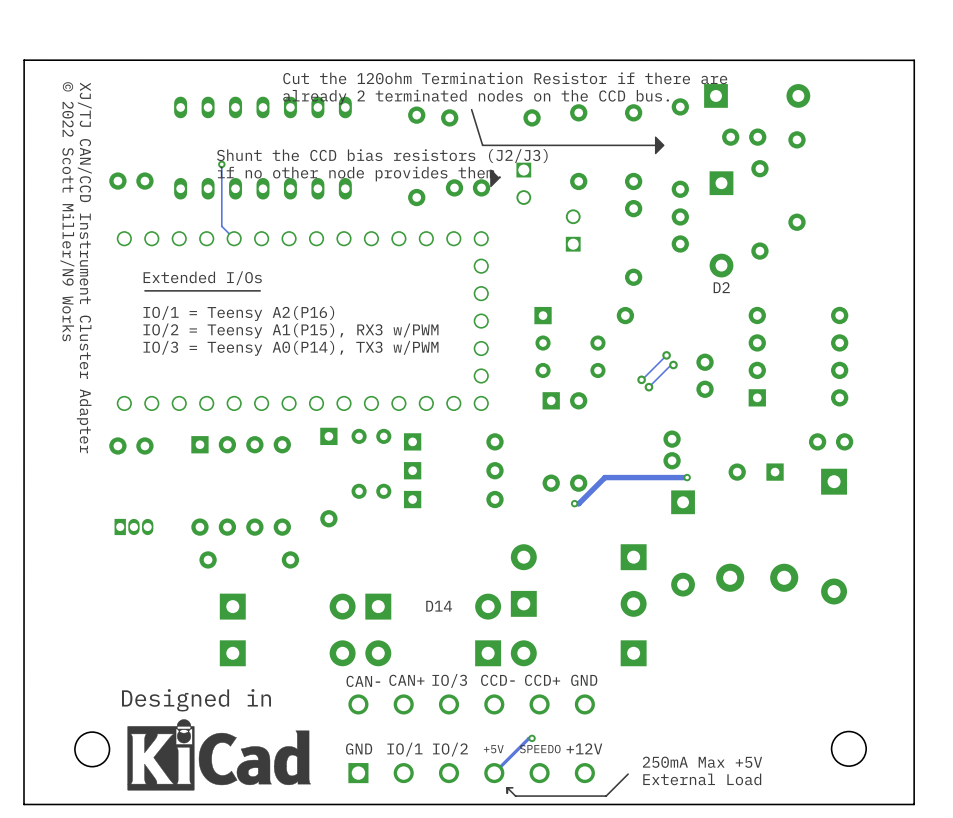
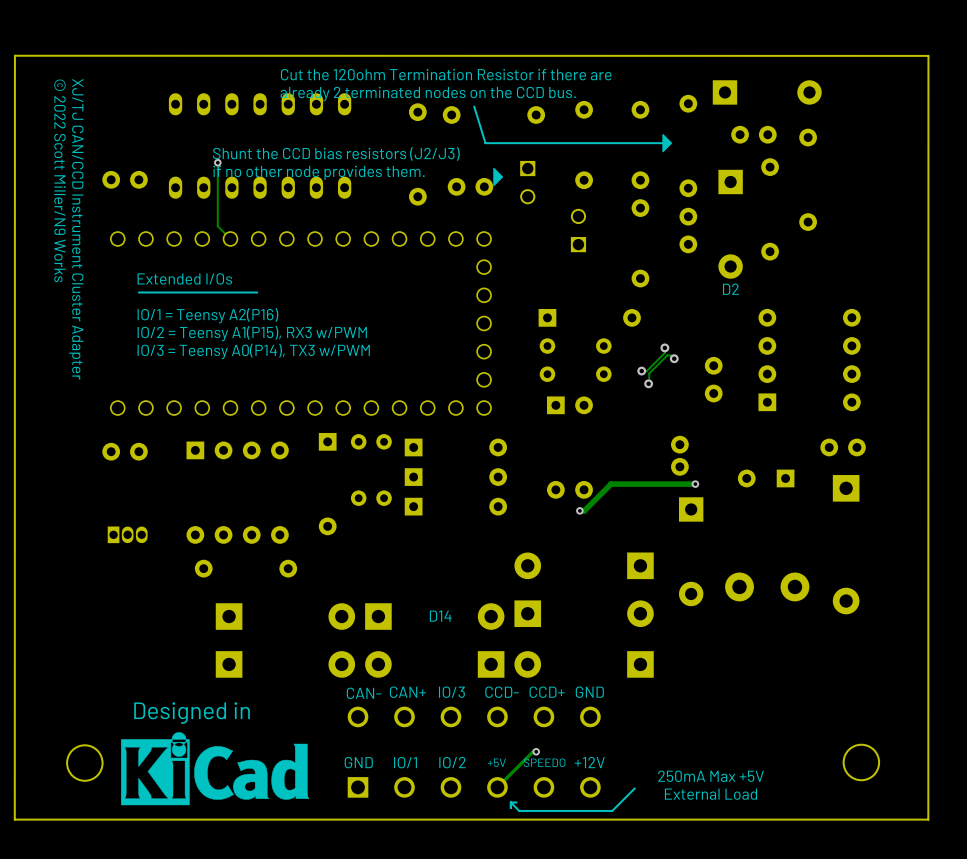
track: none -> (664, 347) (664, 352) (646, 371) (641, 371)
via: none -> (664, 347)
track: none -> (672, 355) (667, 355) (649, 373) (649, 378)
track: (666, 355) (641, 379) -> none
track: (673, 365) (671, 365) (648, 387) -> none
via: (673, 365) -> none
via: none -> (641, 371)
via: (648, 387) -> none

